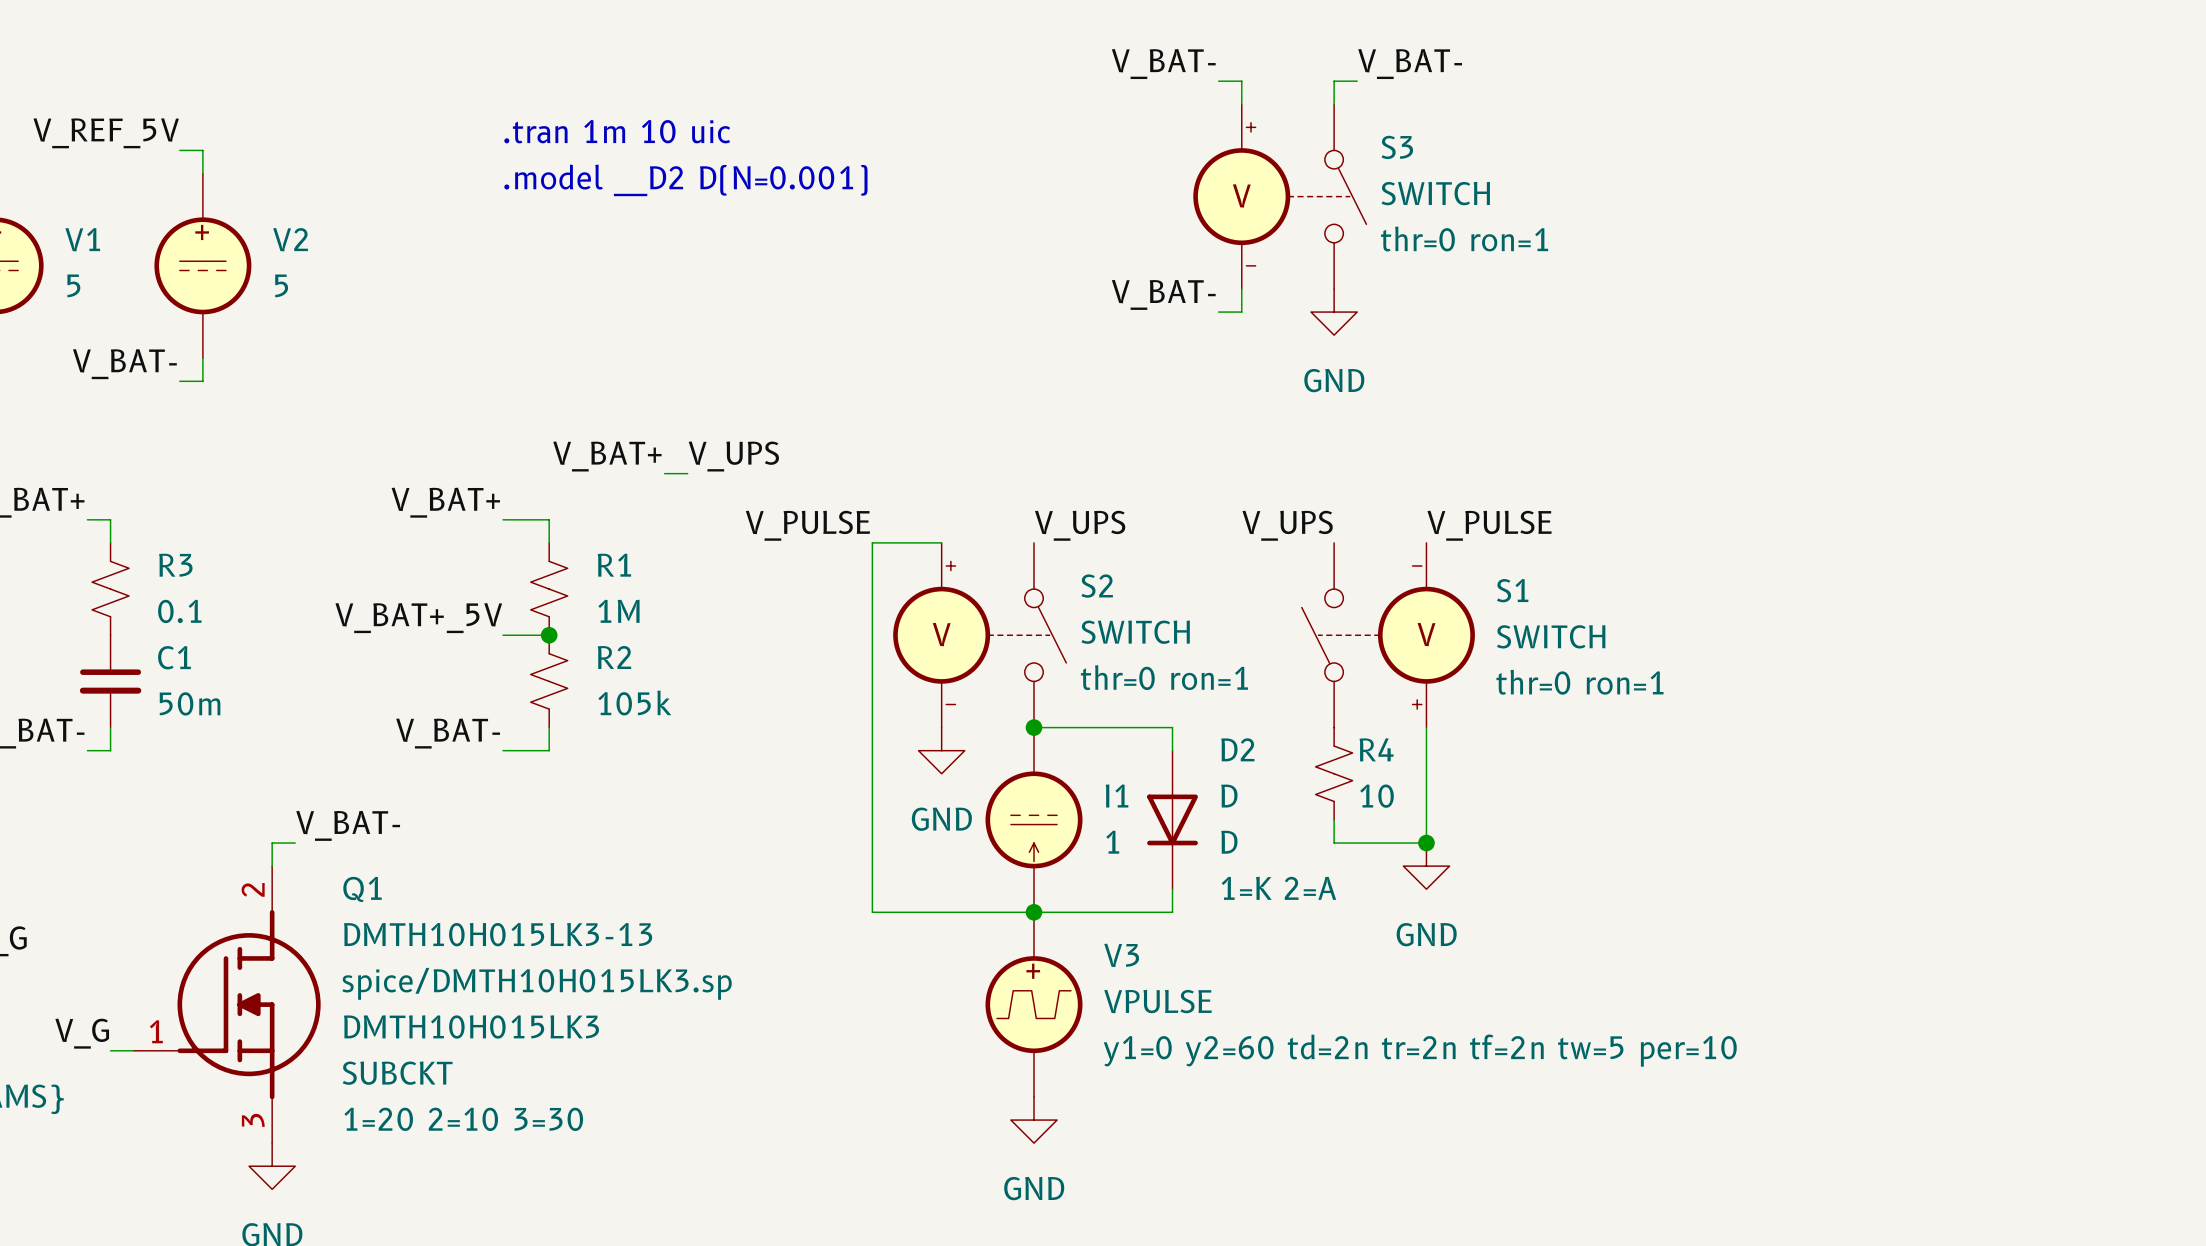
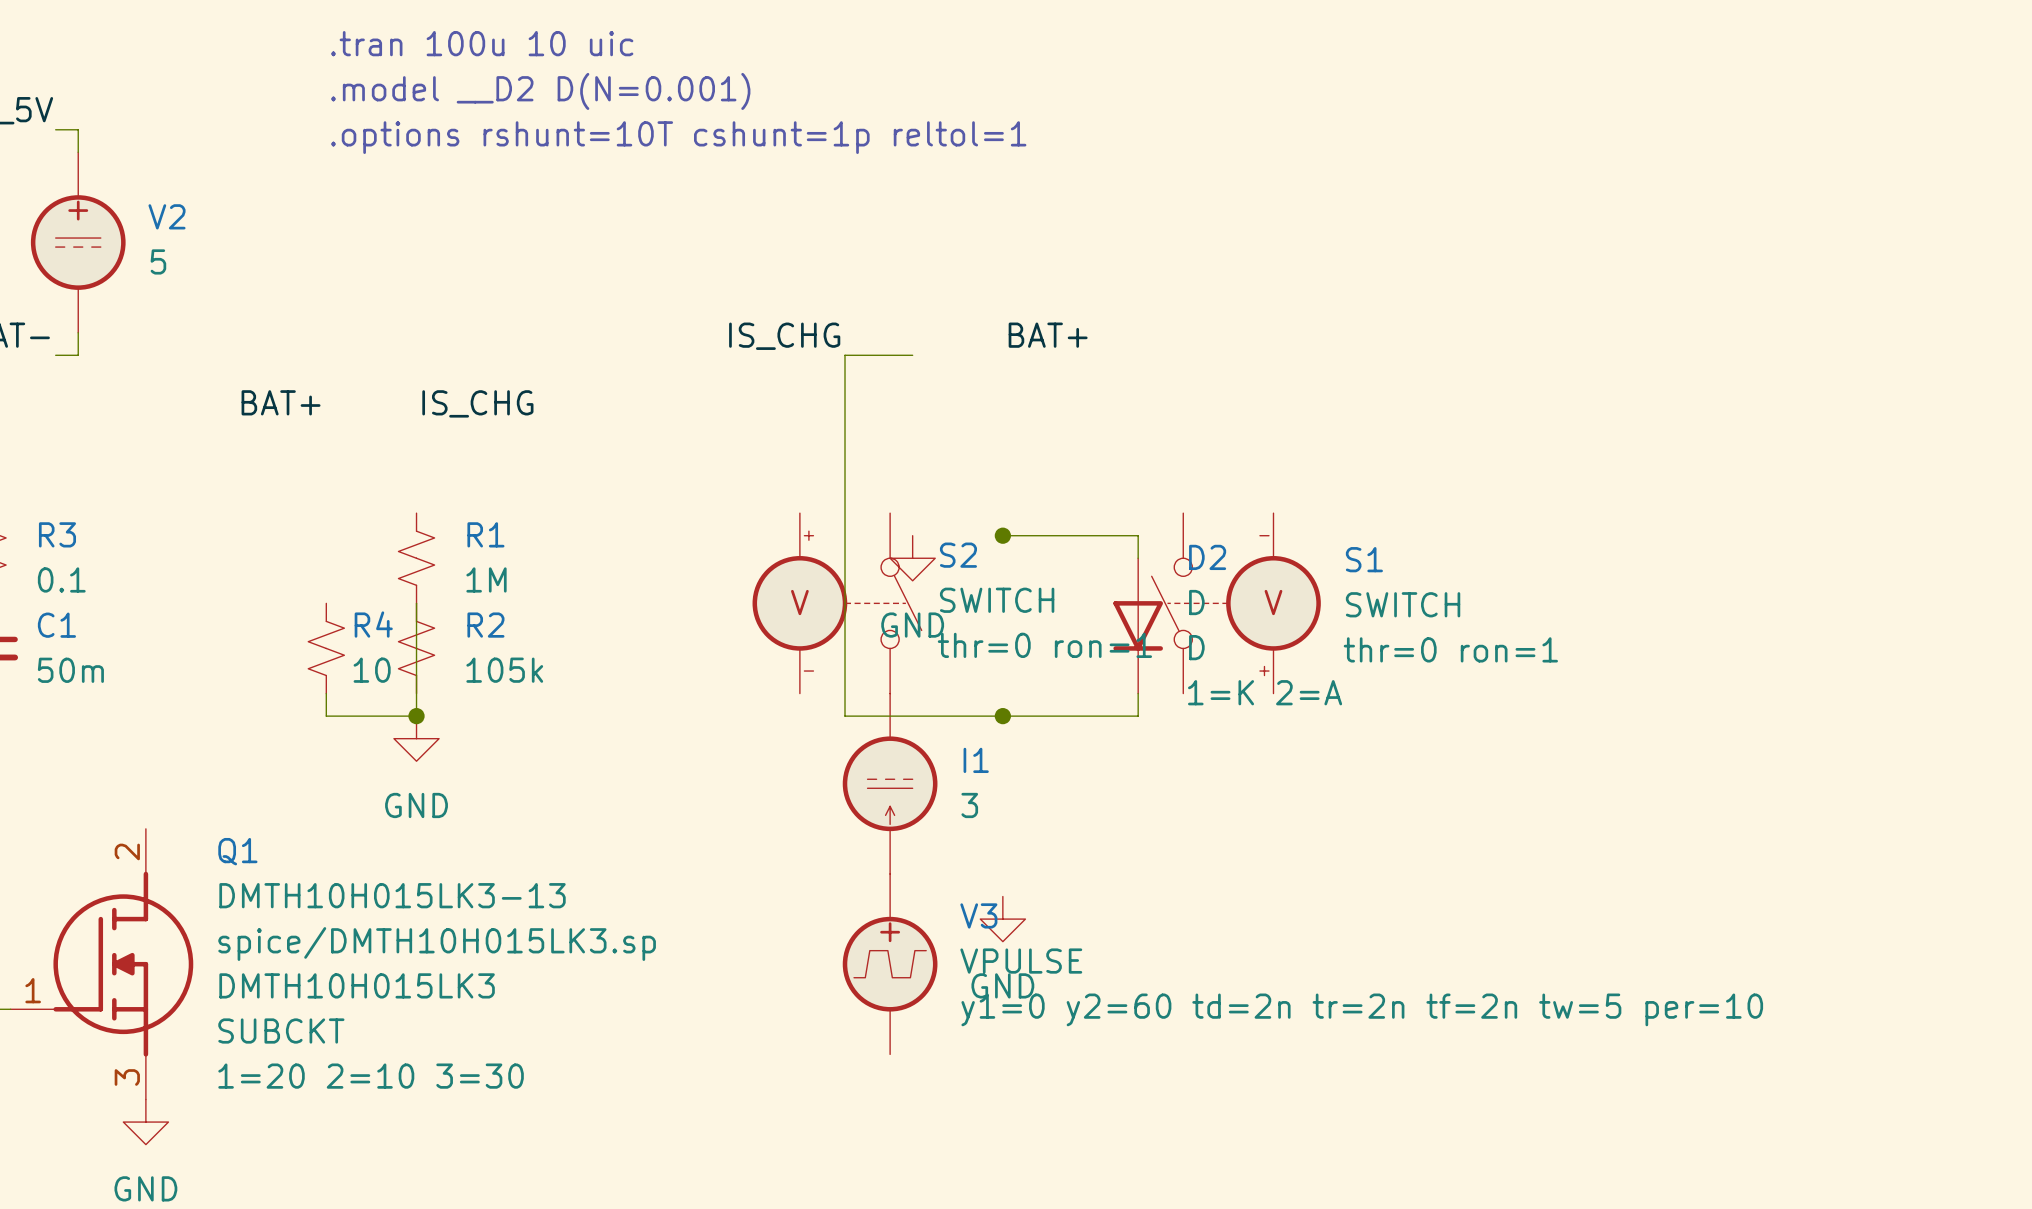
text: none -> .tran 100u 10 uic (482, 43)
label: V_BAT- (1163, 64) -> none
label: V_BAT- (1410, 64) -> none
wire: (1218, 81) (1241, 81) (1241, 104) -> none
wire: (1357, 81) (1334, 81) (1334, 104) -> none
text: .tran 1m 10 uic (617, 131) -> none
text: none -> .options rshunt=10T cshunt=1p reltol=1 (678, 137)
text position: .model __D2 D(N=0.001) (685, 180) -> .model __D2 D(N=0.001) (540, 91)
S3: SWITCH (1279, 196) -> none
wire: (1241, 288) (1241, 312) (1218, 312) -> none
label: V_BAT- (1163, 294) -> none
power symbol: GND (1334, 312) -> none
label: none -> BAT+ (1048, 335)
label: none -> IS_CHG (784, 336)
label: none -> BAT+ (281, 402)
label: none -> IS_CHG (477, 403)
label: V_BAT+ (607, 456) -> none
label: V_UPS (733, 456) -> none
wire: (664, 473) (687, 473) -> none
label: V_BAT+ (445, 502) -> none
wire: (503, 519) (549, 519) (549, 542) -> none
label: V_PULSE (807, 525) -> none
label: V_UPS (1080, 525) -> none
label: V_UPS (1287, 525) -> none
label: V_PULSE (1489, 525) -> none
wire: (941, 542) (872, 542) (872, 912) (1172, 912) (1172, 889) -> (912, 355) (845, 355) (845, 716) (1138, 716) (1138, 693)
junction: none -> (1002, 535)
power symbol: none -> GND (912, 558)
label: V_BAT+_5V (418, 618) -> none
wire: (503, 635) (549, 635) -> (416, 693) (416, 603)
junction: (549, 635) -> none
wire: none -> (326, 693) (326, 716) (371, 716)
wire: (1033, 727) (1172, 727) (1172, 750) -> (1002, 535) (1138, 535) (1138, 558)
junction: (1033, 727) -> none
wire: (1426, 727) (1426, 843) (1334, 843) (1334, 819) -> none
label: V_BAT- (448, 733) -> none
junction: none -> (416, 716)
power symbol: GND (941, 750) -> none
junction: none -> (1002, 716)
power symbol: none -> GND (416, 738)
R4 position: (1334, 773) -> (326, 648)
D2 position: (1172, 819) -> (1138, 625)
label: V_BAT- (348, 825) -> none
I1 value: 1 (1112, 842) -> 3 (969, 805)
wire: (295, 843) (272, 843) (272, 866) -> none
junction: (1426, 843) -> none
power symbol: GND (1426, 866) -> none
junction: (1033, 912) -> none
power symbol: none -> GND (1002, 919)
power symbol: GND (1033, 1120) -> none

